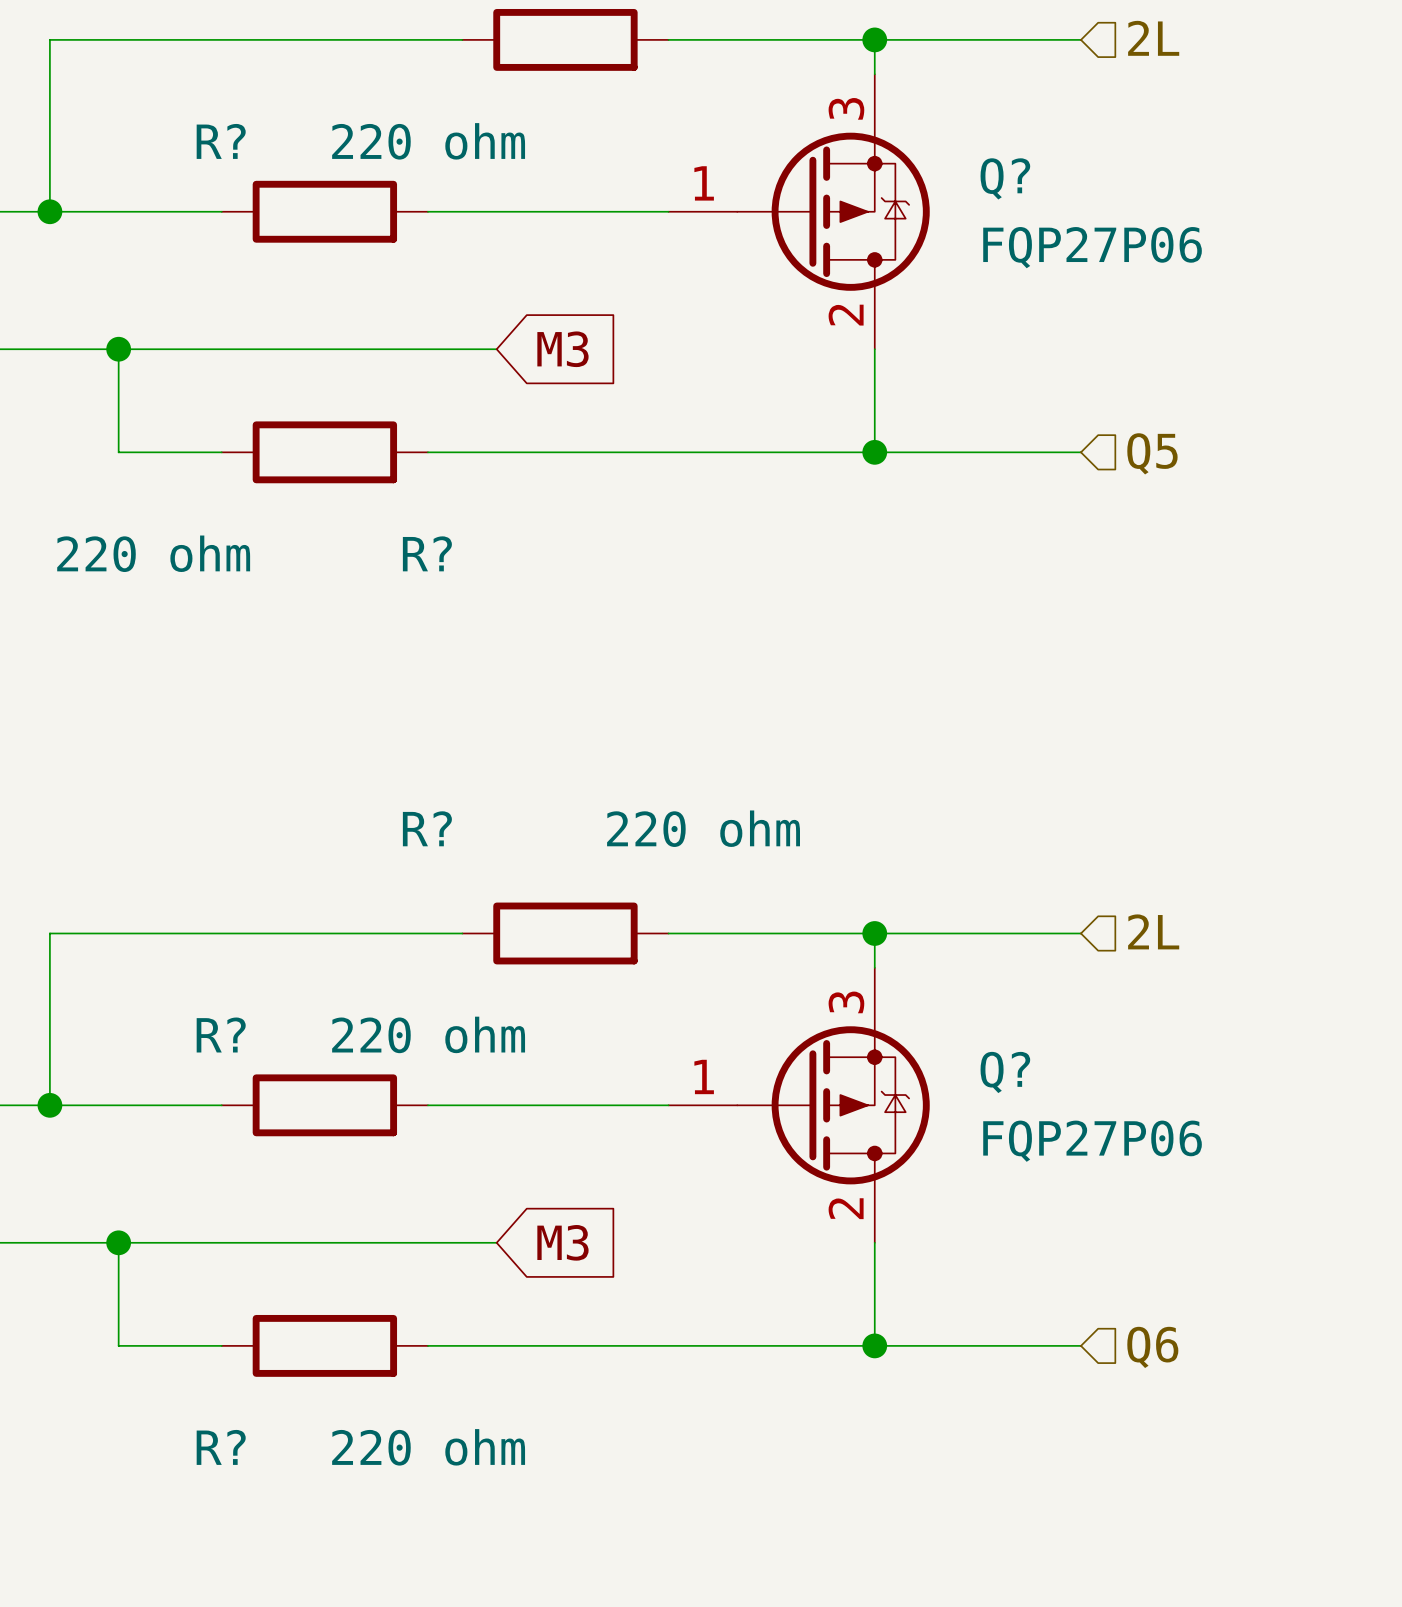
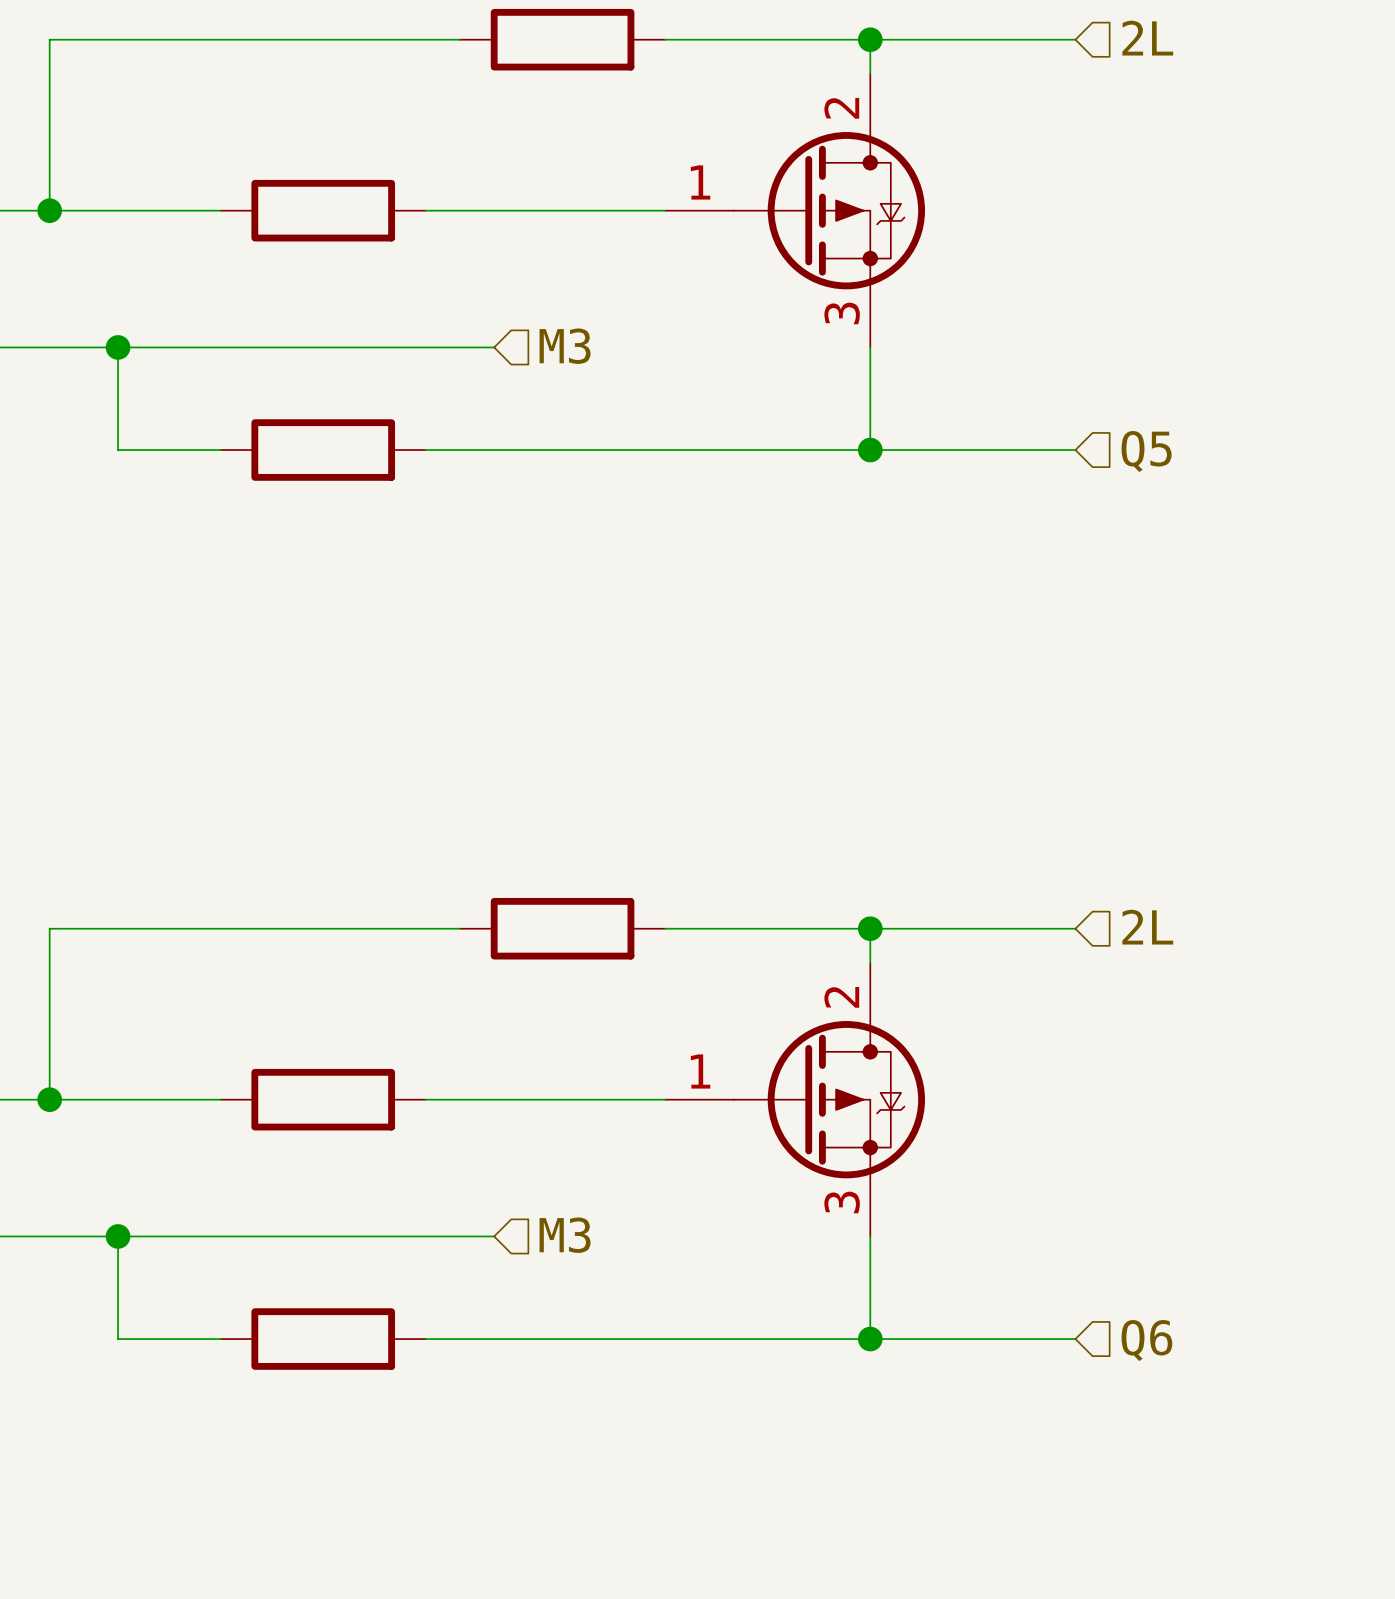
R? name: R? (221, 141) -> none
R? value: 220 ohm (428, 141) -> none
Q?: FQP27P06 (799, 211) -> none
part: none -> (795, 210)
hierarchical label: none -> M3 (565, 346)
global label: M3 (562, 349) -> none
R? value: 220 ohm (153, 553) -> none
R? name: R? (427, 553) -> none
R? name: R? (427, 828) -> none
R? value: 220 ohm (703, 828) -> none
R? value: 220 ohm (428, 1034) -> none
R? name: R? (221, 1035) -> none
Q?: FQP27P06 (799, 1105) -> none
part: none -> (795, 1099)
hierarchical label: none -> M3 (565, 1235)
global label: M3 (562, 1242) -> none
R? name: R? (221, 1447) -> none
R? value: 220 ohm (428, 1447) -> none

